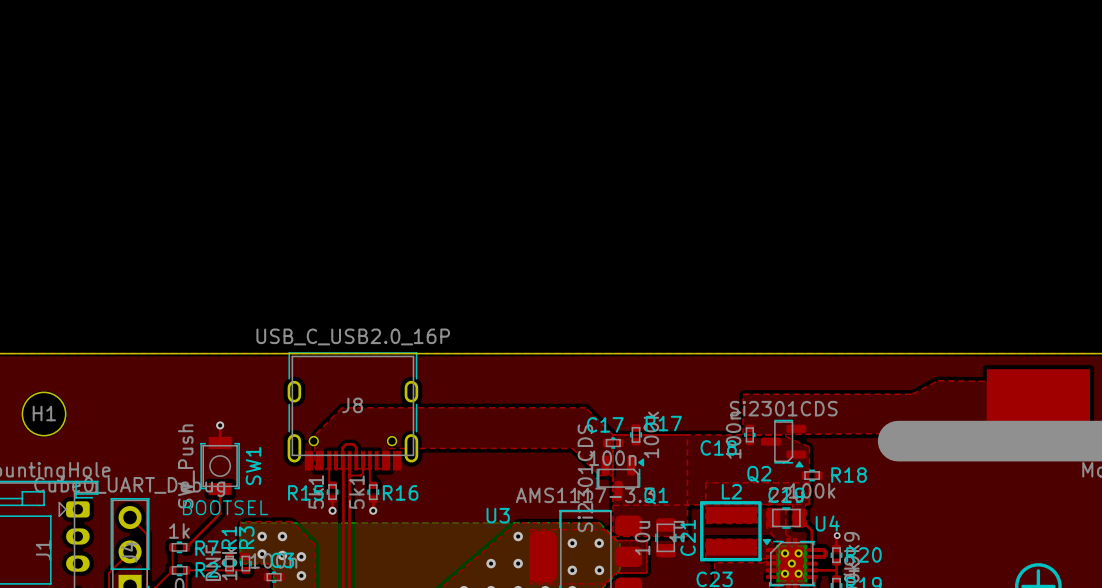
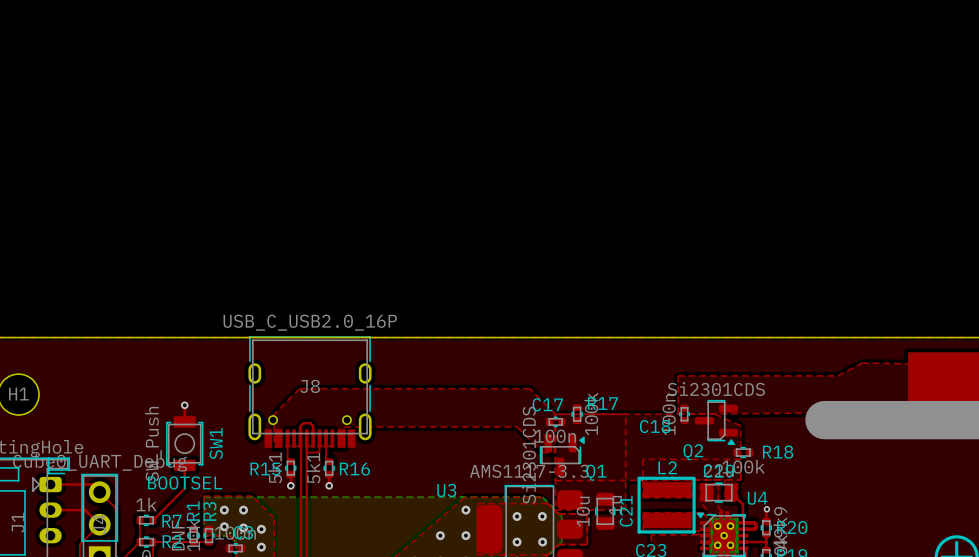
top track: none -> (50, 484) (92, 484) (99, 492)
top track: none -> (50, 510) (85, 510) (99, 524)

